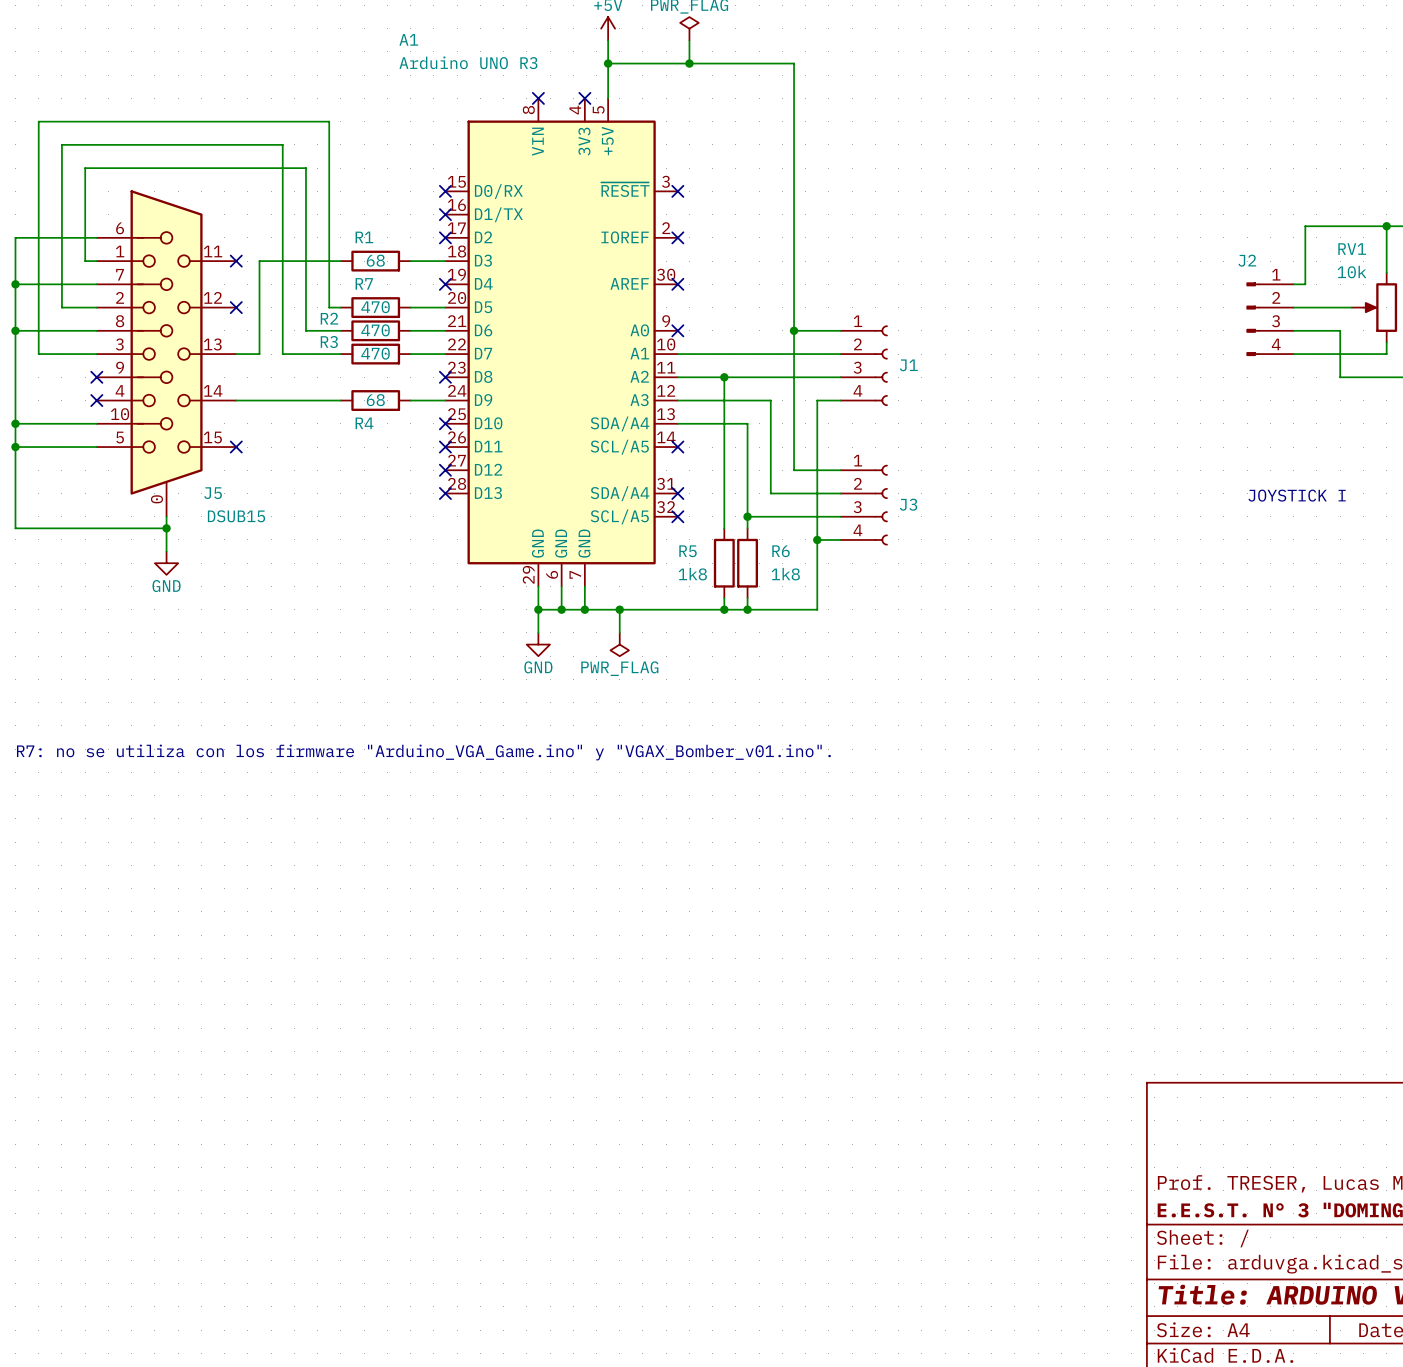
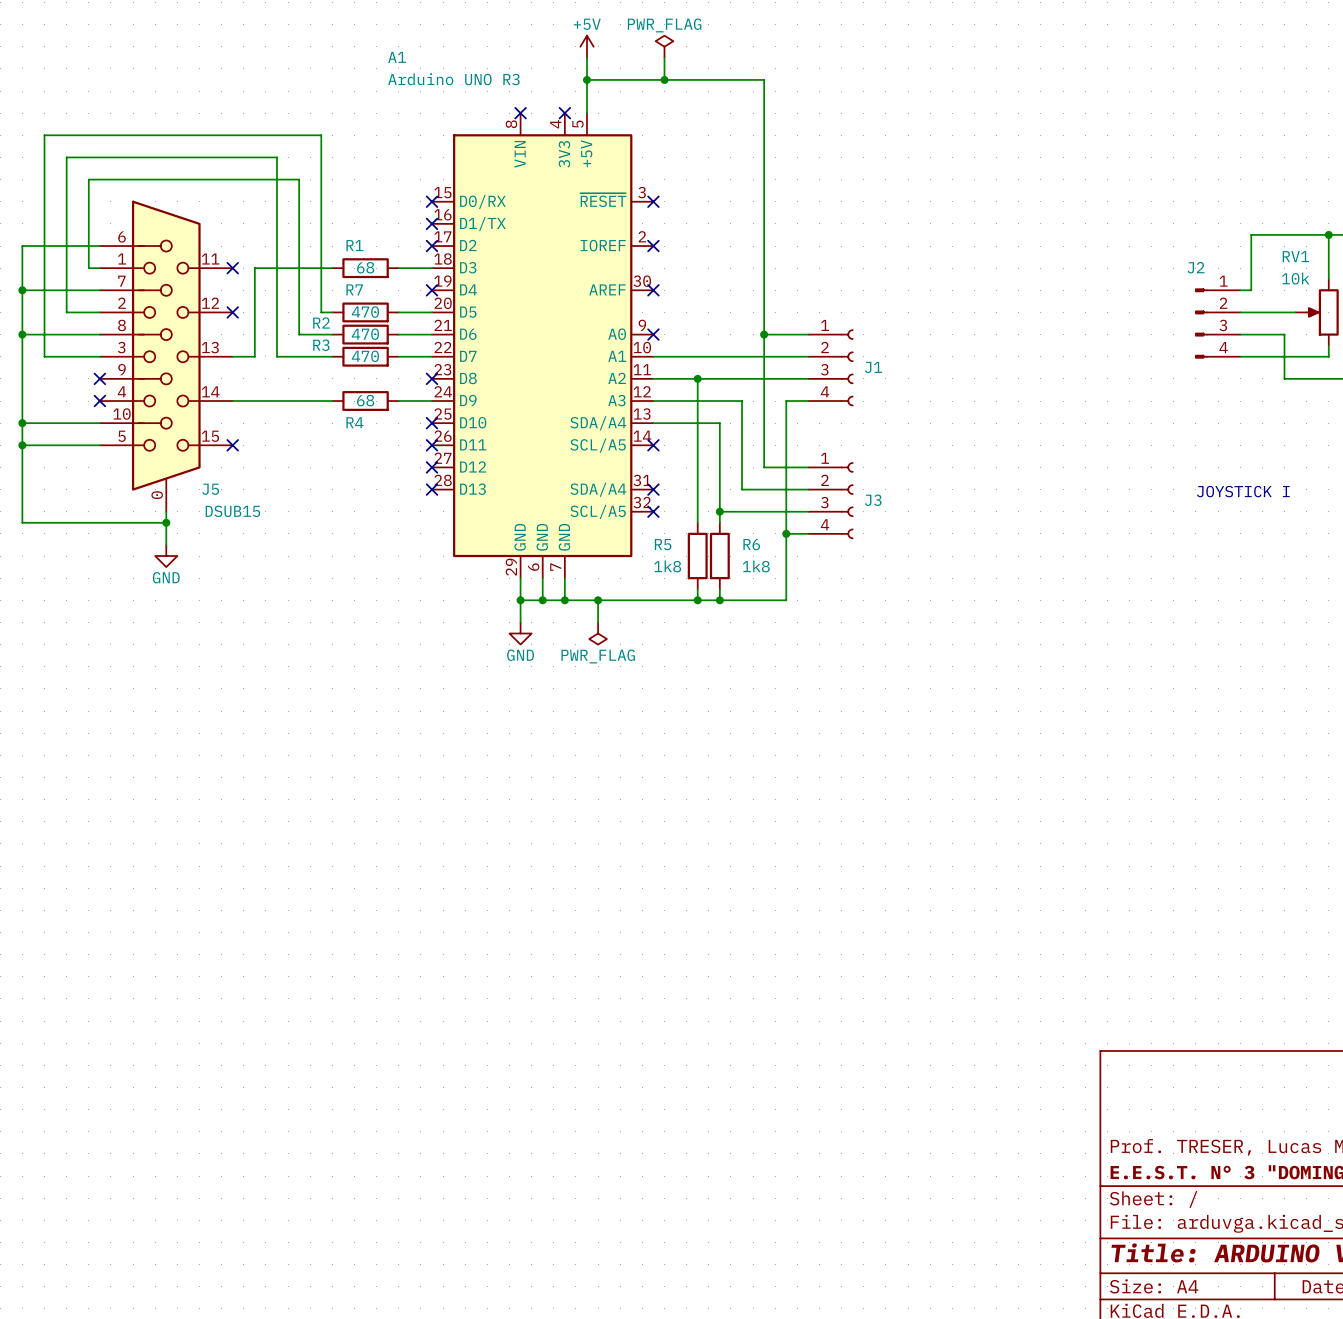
text: R7: no se utiliza con los firmware "Arduino_VGA_Game.ino" y "VGAX_Bomber_v01.ino". (423, 752) -> none

